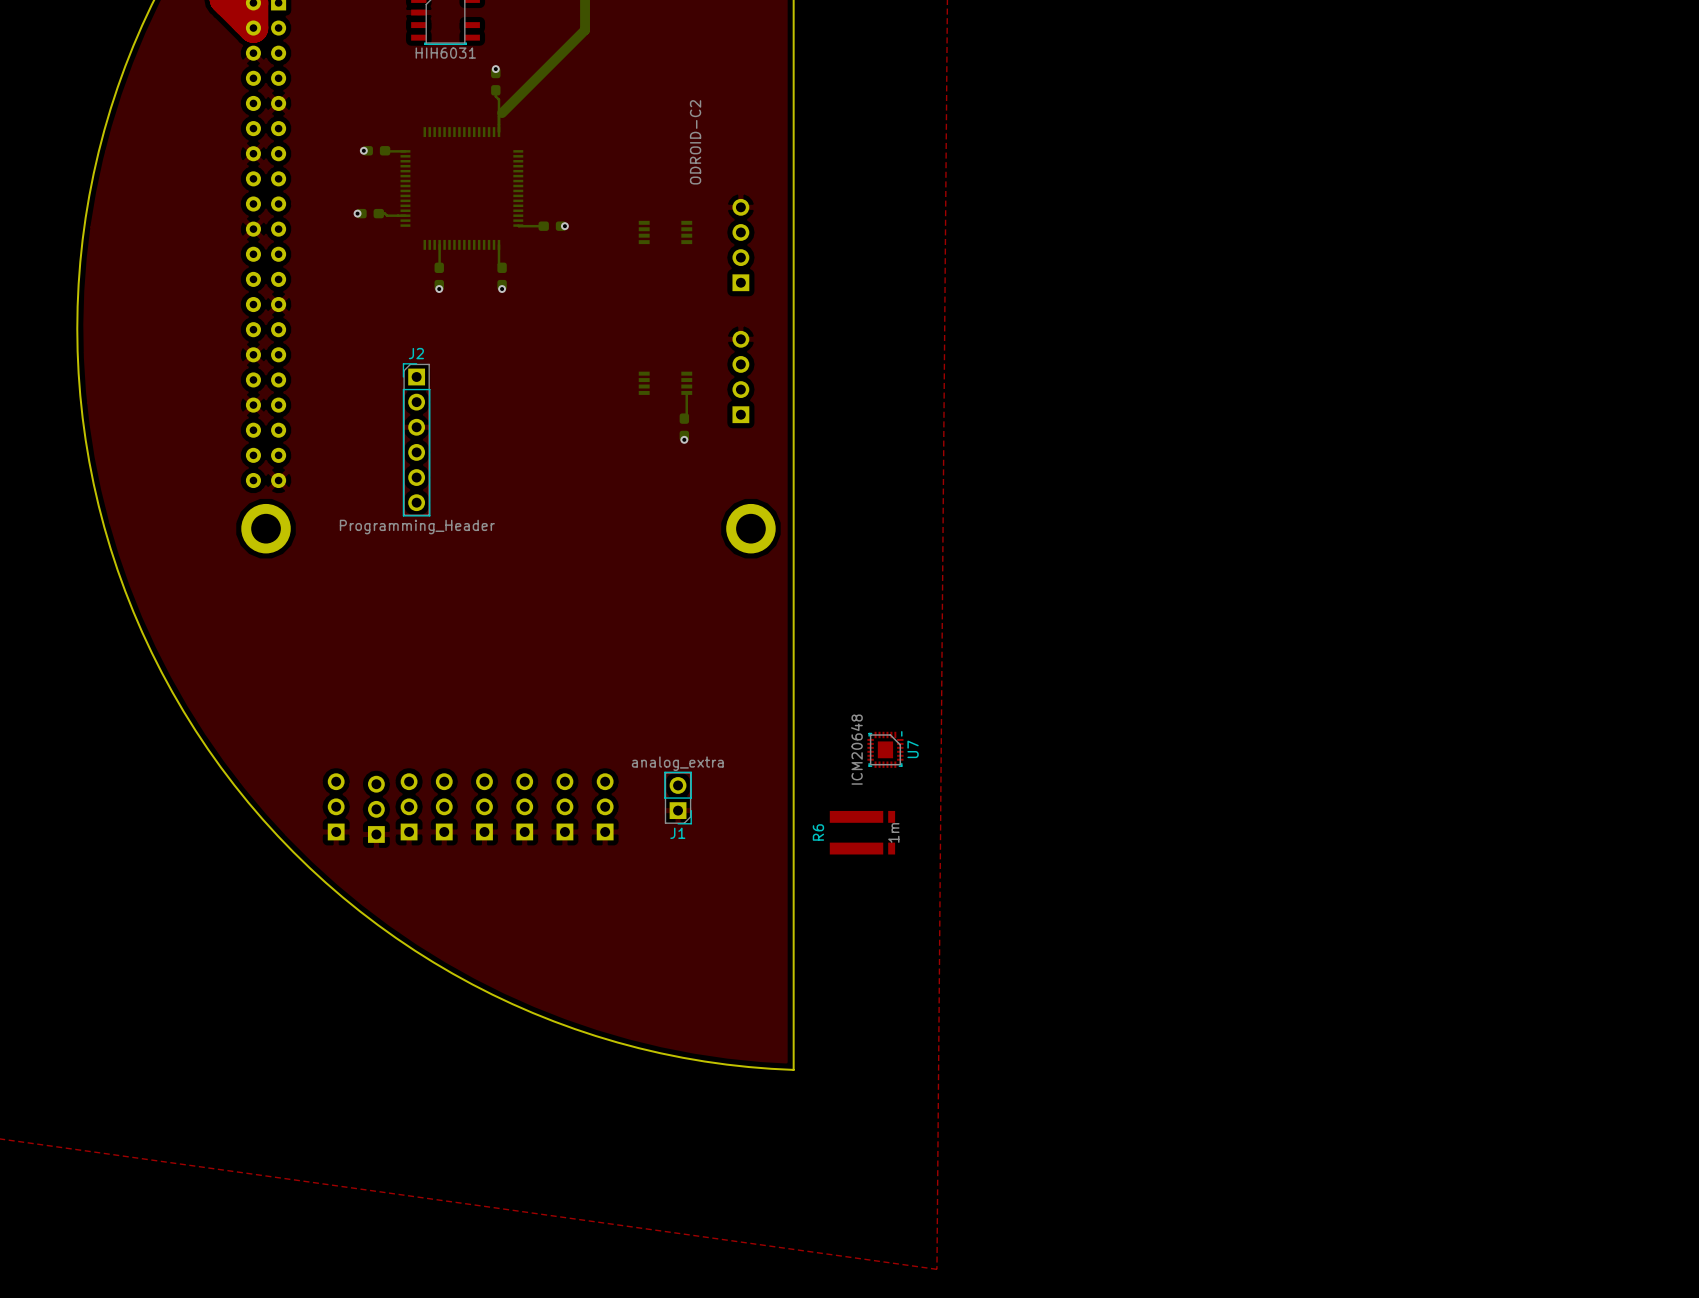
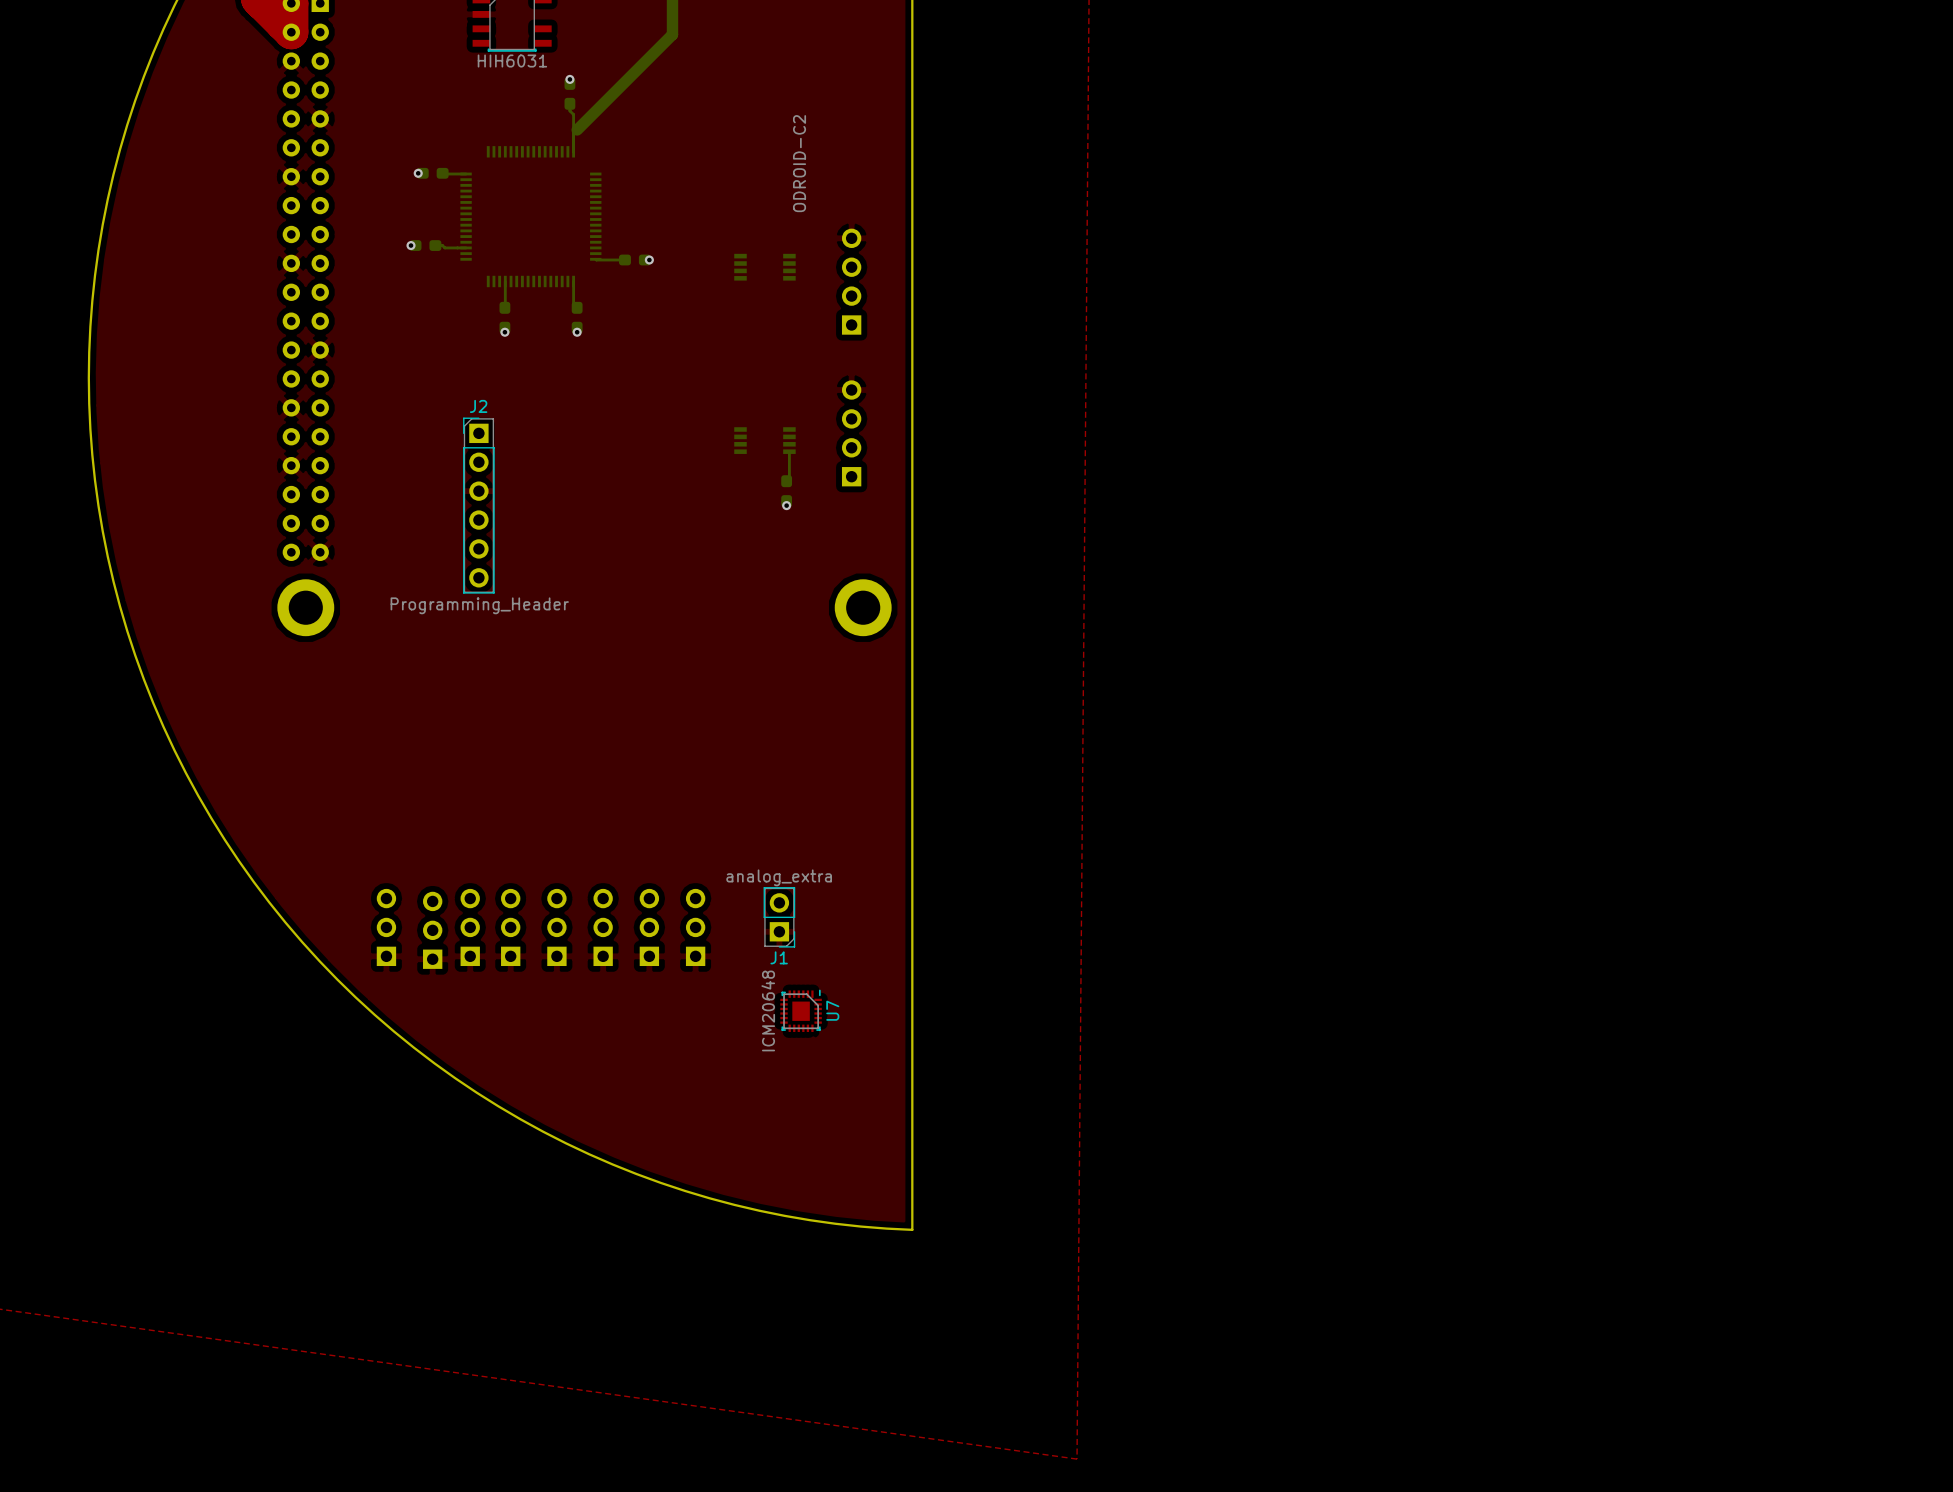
U7 position: (885, 749) -> (801, 1010)
R6: 1m (862, 832) -> none

